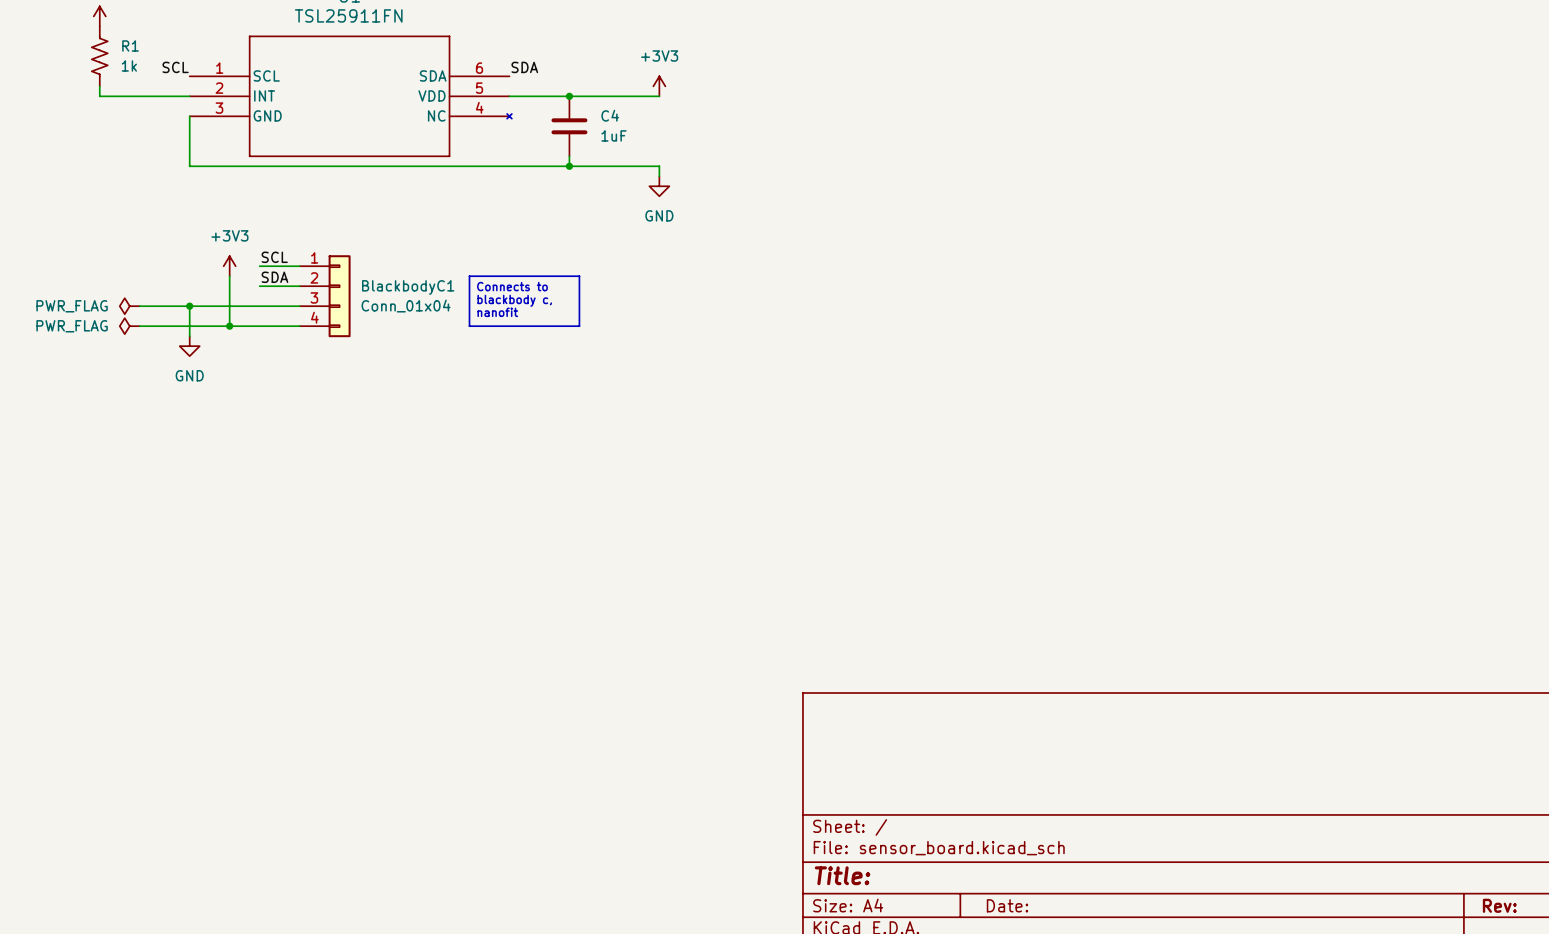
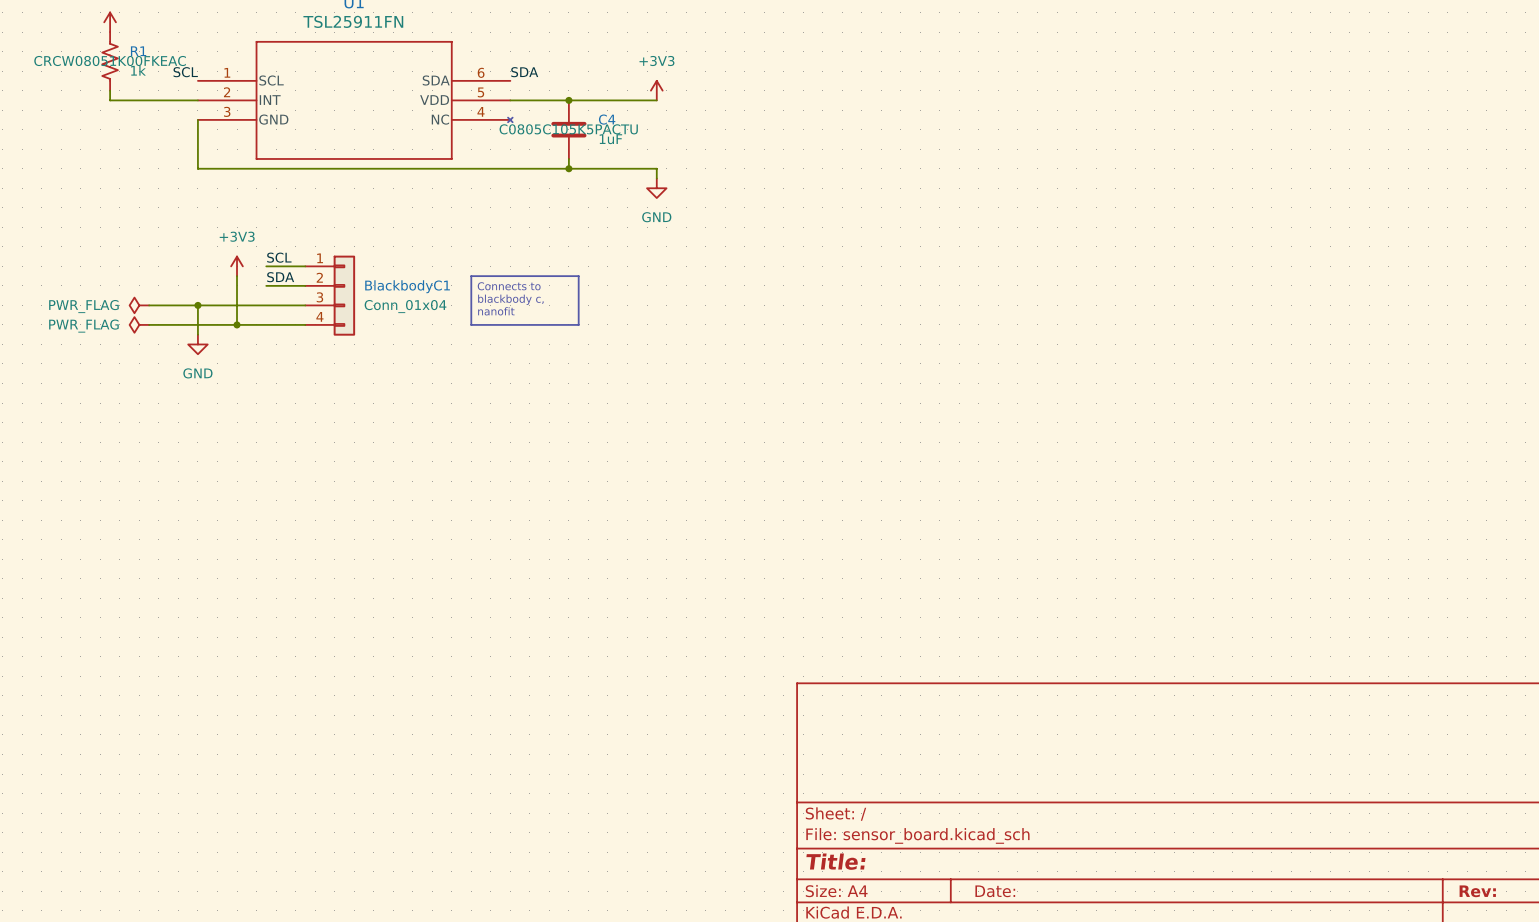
R1 text: none -> CRCW08051K00FKEAC (110, 61)
C4 text: none -> C0805C105K5PACTU (568, 129)

